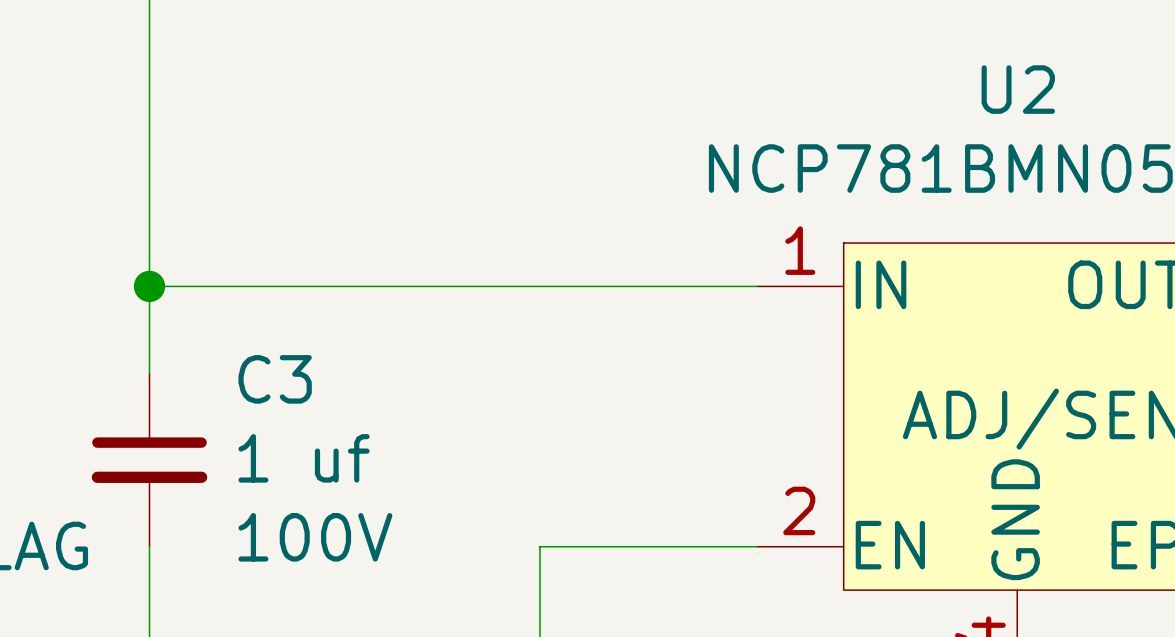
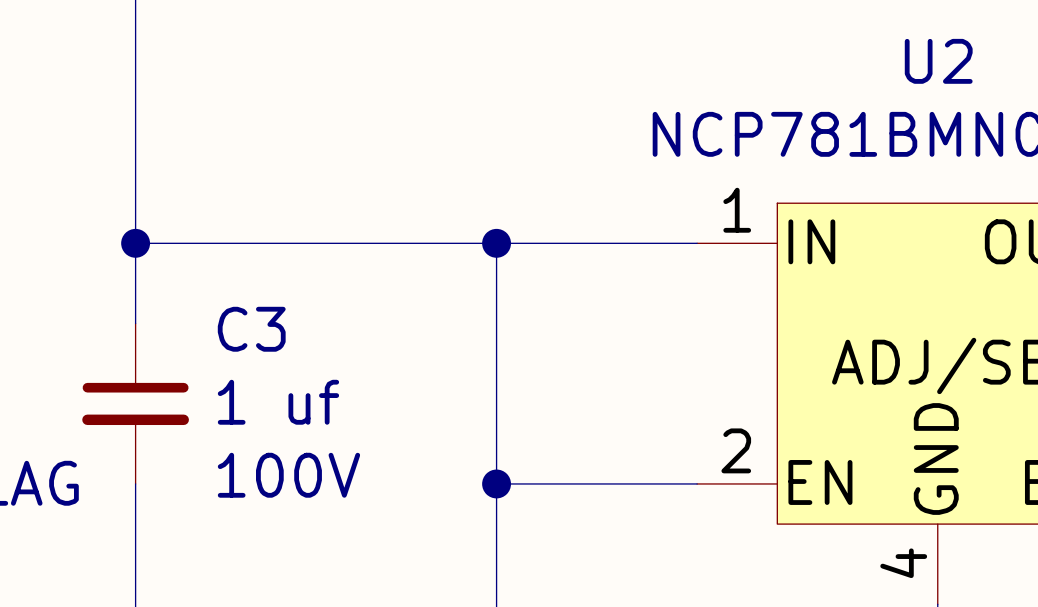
wire: none -> (496, 243) (496, 483)
junction: none -> (496, 243)
junction: none -> (496, 483)

